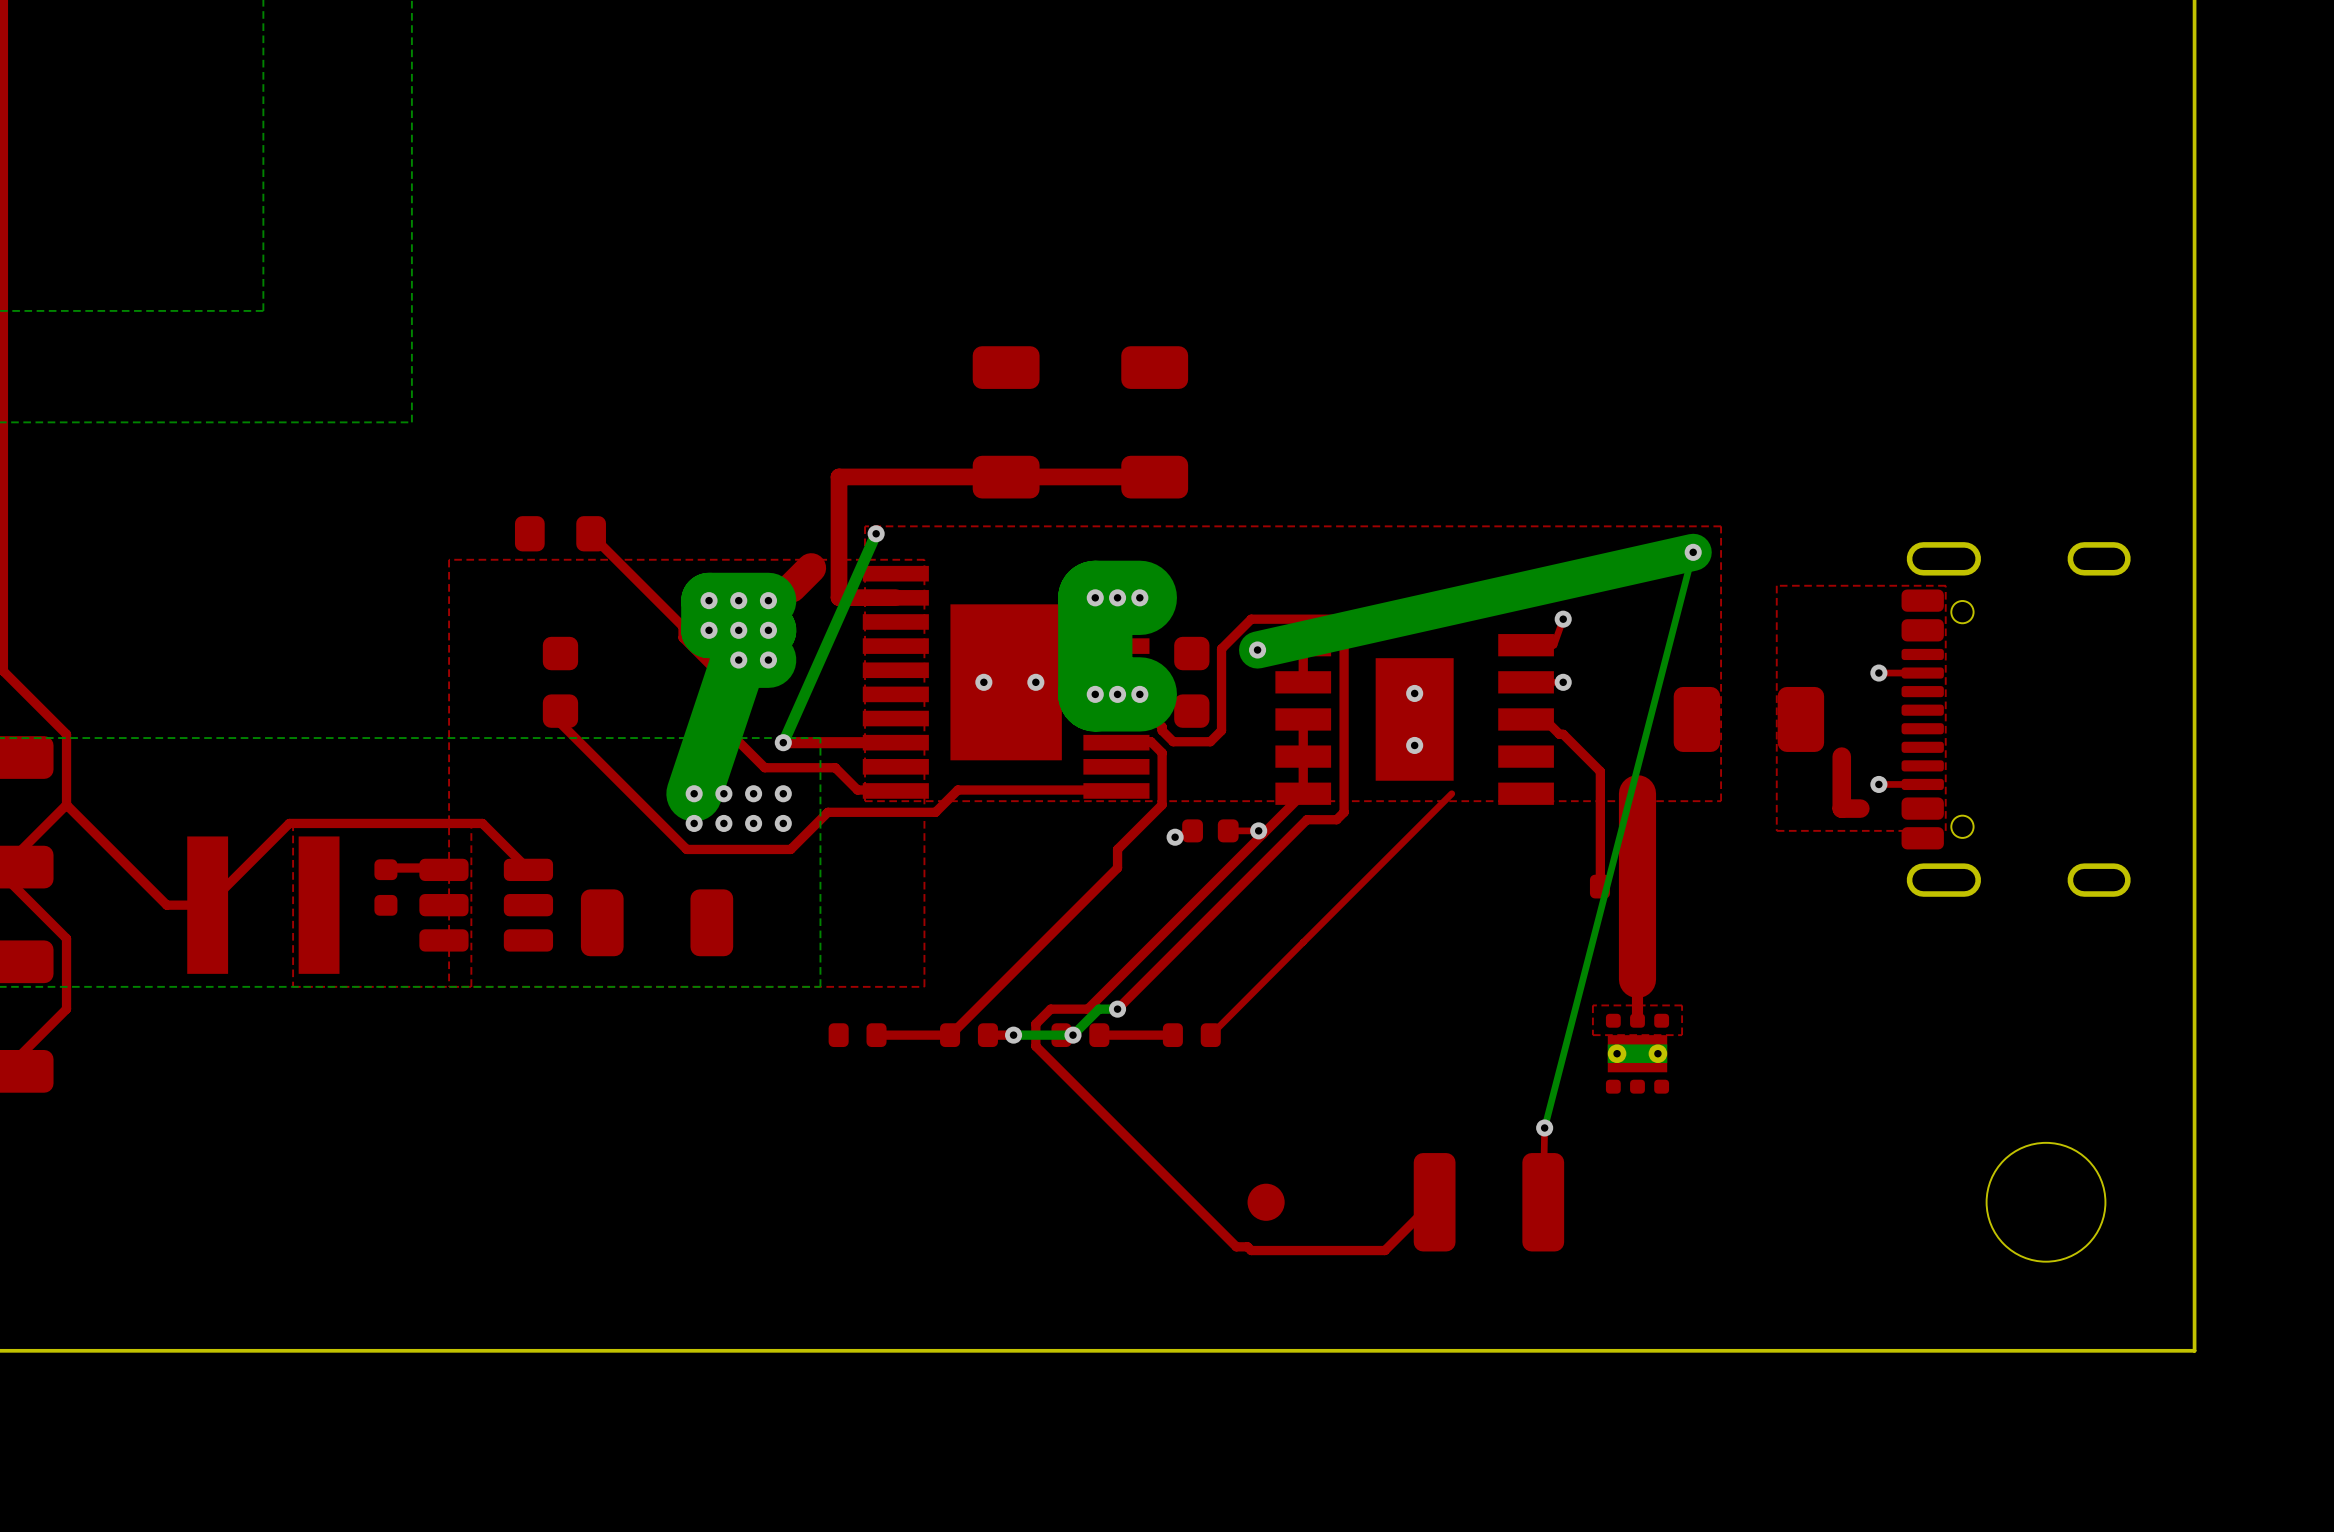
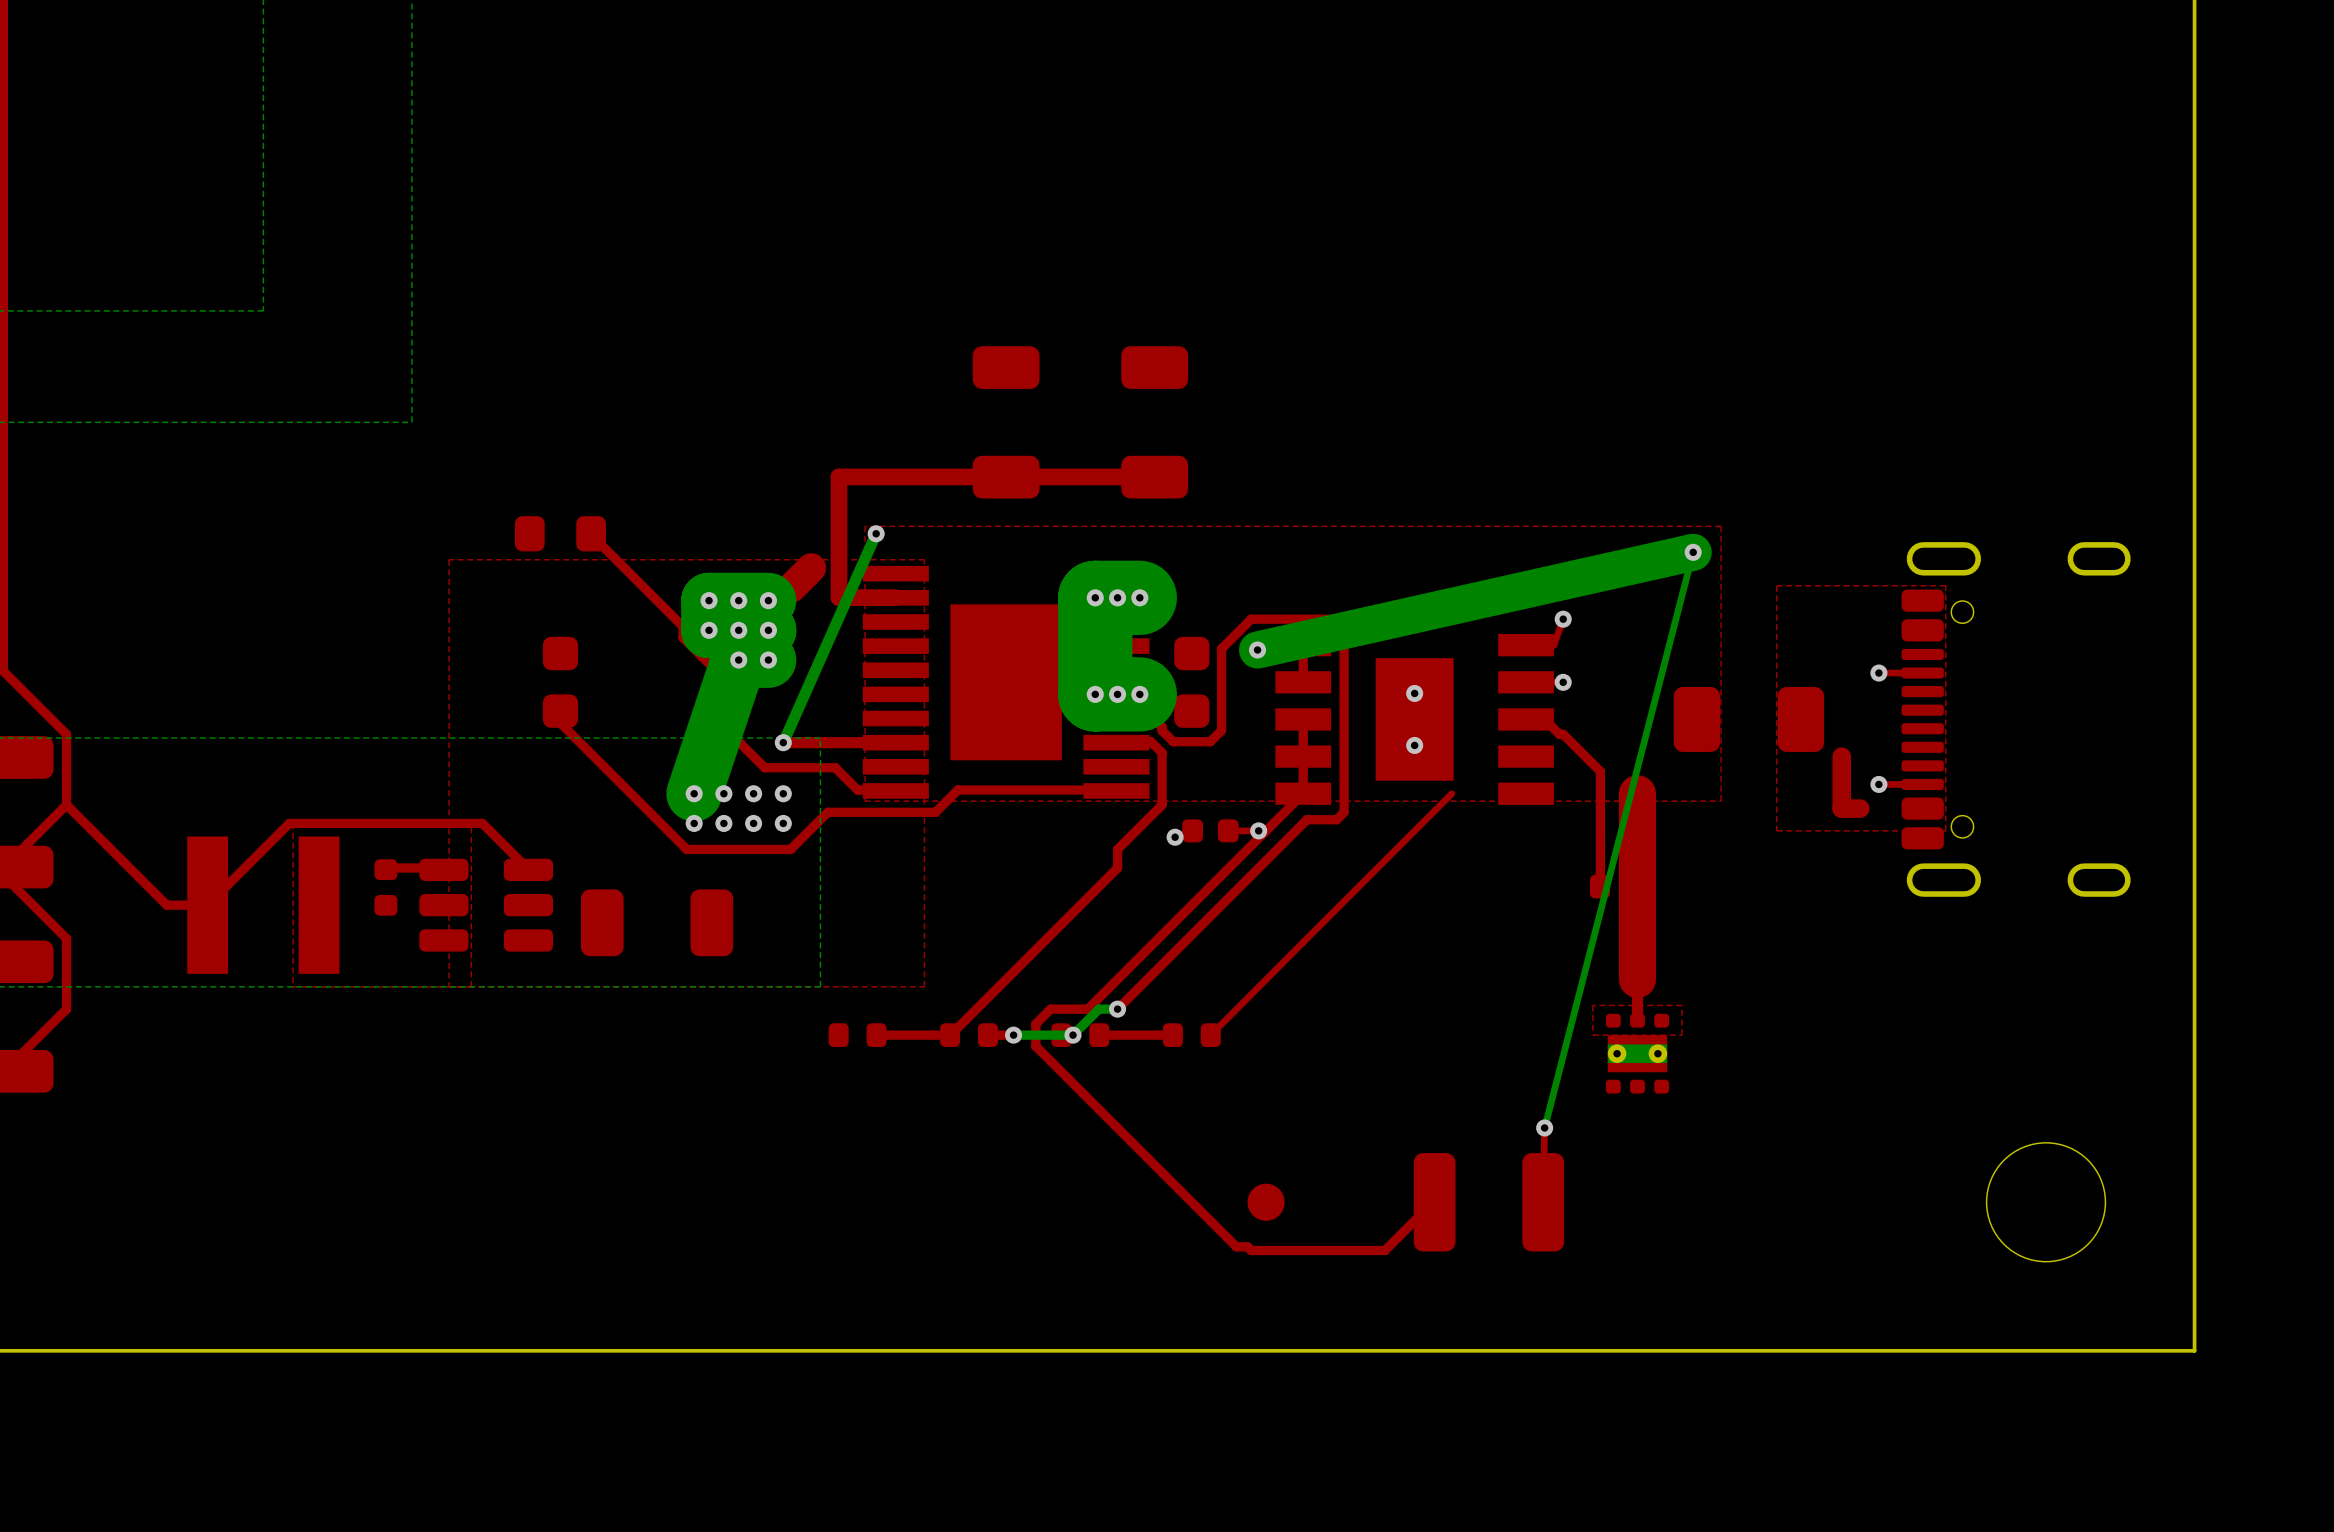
via: (983, 682) -> none
via: (1035, 682) -> none

